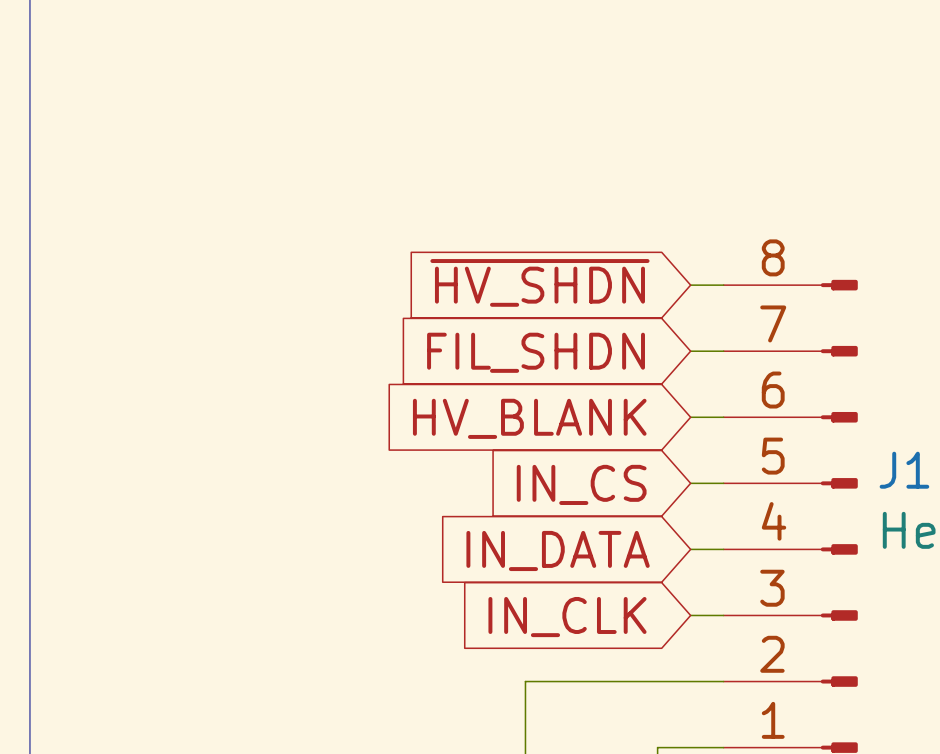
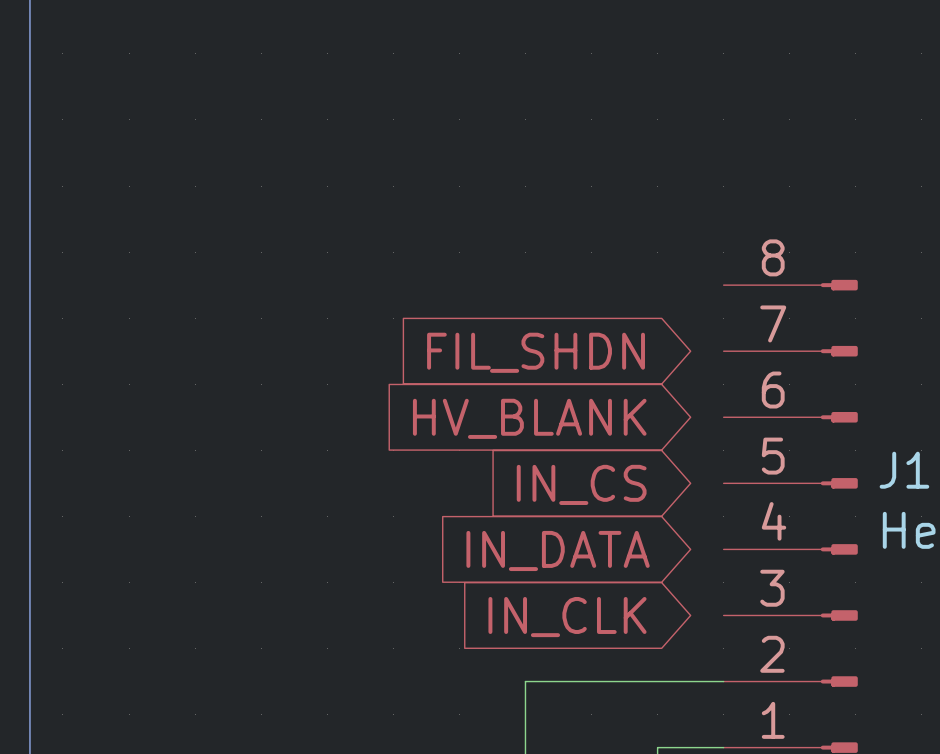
global label: ~{HV_SHDN} (539, 282) -> none
wire: (690, 285) (723, 285) -> none
wire: (690, 351) (723, 351) -> none
wire: (690, 417) (723, 417) -> none
wire: (690, 483) (723, 483) -> none
wire: (690, 549) (723, 549) -> none
wire: (690, 615) (723, 615) -> none

